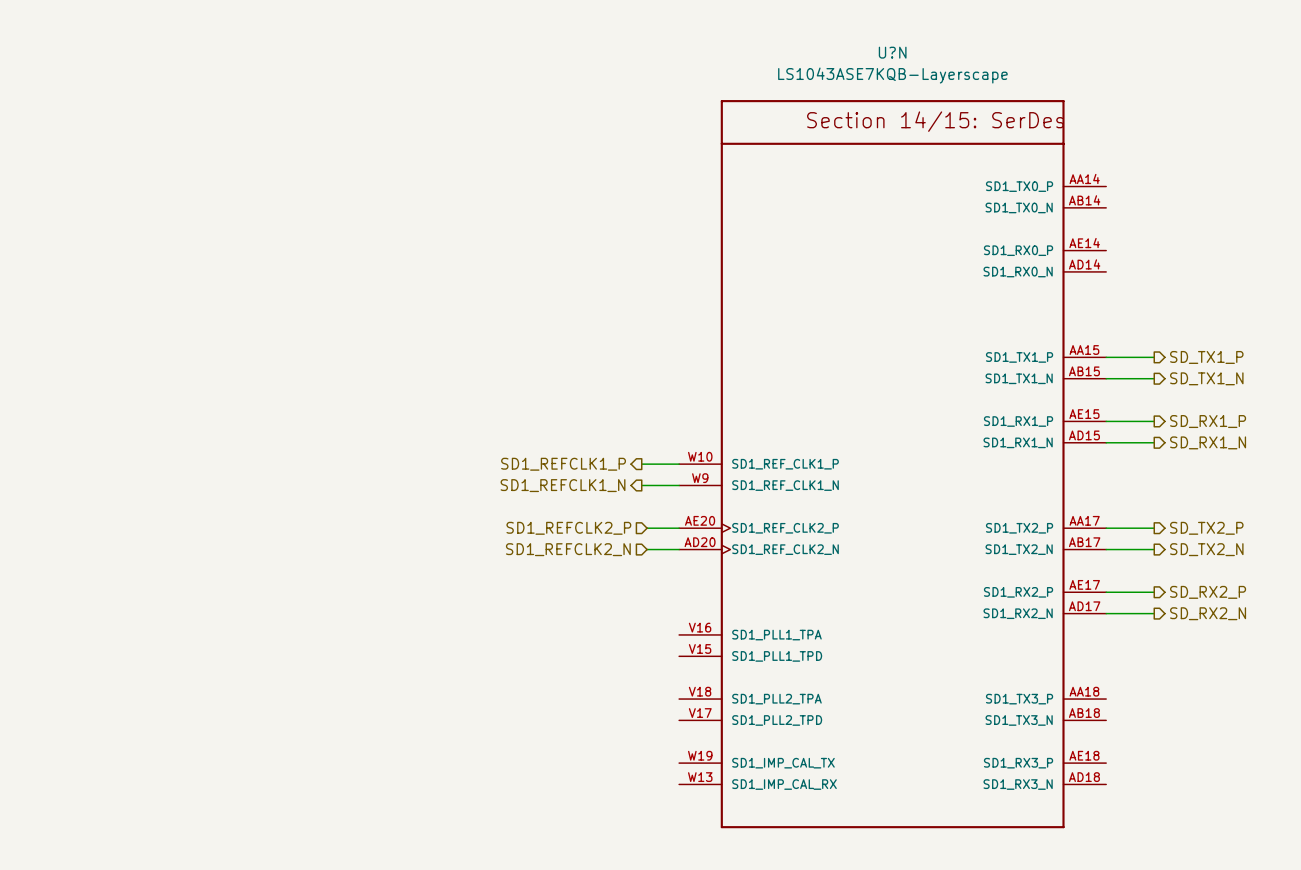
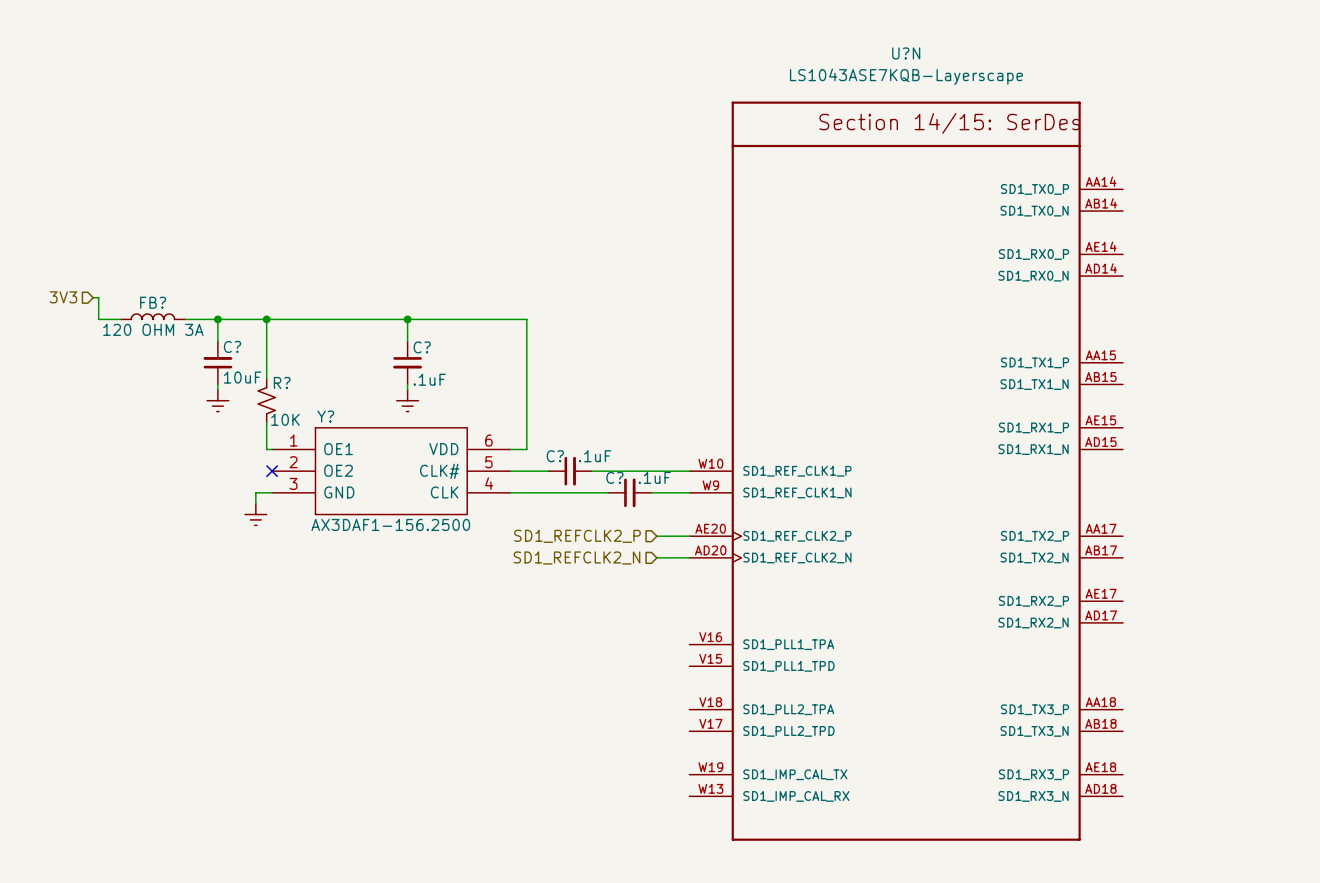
hierarchical label: none -> 3V3 (63, 297)
wire: none -> (93, 297) (98, 297) (98, 319) (120, 319)
FB?: none -> 120 OHM 3A (152, 316)
wire: none -> (185, 319) (526, 319) (526, 449) (510, 449)
wire: none -> (217, 319) (217, 341)
junction: none -> (217, 319)
wire: none -> (266, 319) (266, 379)
junction: none -> (266, 319)
wire: none -> (407, 319) (407, 341)
junction: none -> (407, 319)
C?: none -> 10uF (217, 362)
C?: none -> .1uF (407, 362)
wire: (1106, 357) (1154, 357) -> none
hierarchical label: SD_TX1_P (1206, 357) -> none
wire: none -> (217, 384) (217, 389)
wire: none -> (407, 384) (407, 389)
wire: (1106, 378) (1154, 378) -> none
hierarchical label: SD_TX1_N (1206, 378) -> none
power symbol: none -> (217, 400)
R?: none -> 10K (266, 400)
power symbol: none -> (407, 400)
wire: none -> (266, 422) (266, 449) (272, 449)
wire: (1106, 421) (1154, 421) -> none
hierarchical label: SD_RX1_P (1208, 421) -> none
wire: (1106, 442) (1154, 442) -> none
hierarchical label: SD_RX1_N (1208, 442) -> none
no-connect mark: none -> (272, 471)
Y?: none -> AX3DAF1-156.2500 (391, 471)
wire: none -> (510, 471) (548, 471)
C?: none -> .1uF (570, 471)
hierarchical label: SD1_REFCLK1_P (563, 464) -> none
wire: none -> (591, 471) (651, 471)
wire: none -> (272, 492) (255, 492) (255, 503)
wire: none -> (510, 492) (608, 492)
hierarchical label: SD1_REFCLK1_N (563, 485) -> none
C?: none -> .1uF (629, 492)
power symbol: none -> (255, 514)
wire: (1106, 528) (1154, 528) -> none
hierarchical label: SD_TX2_P (1206, 528) -> none
wire: (1106, 549) (1154, 549) -> none
hierarchical label: SD_TX2_N (1206, 549) -> none
wire: (1106, 592) (1154, 592) -> none
hierarchical label: SD_RX2_P (1208, 592) -> none
wire: (1106, 613) (1154, 613) -> none
hierarchical label: SD_RX2_N (1208, 613) -> none

